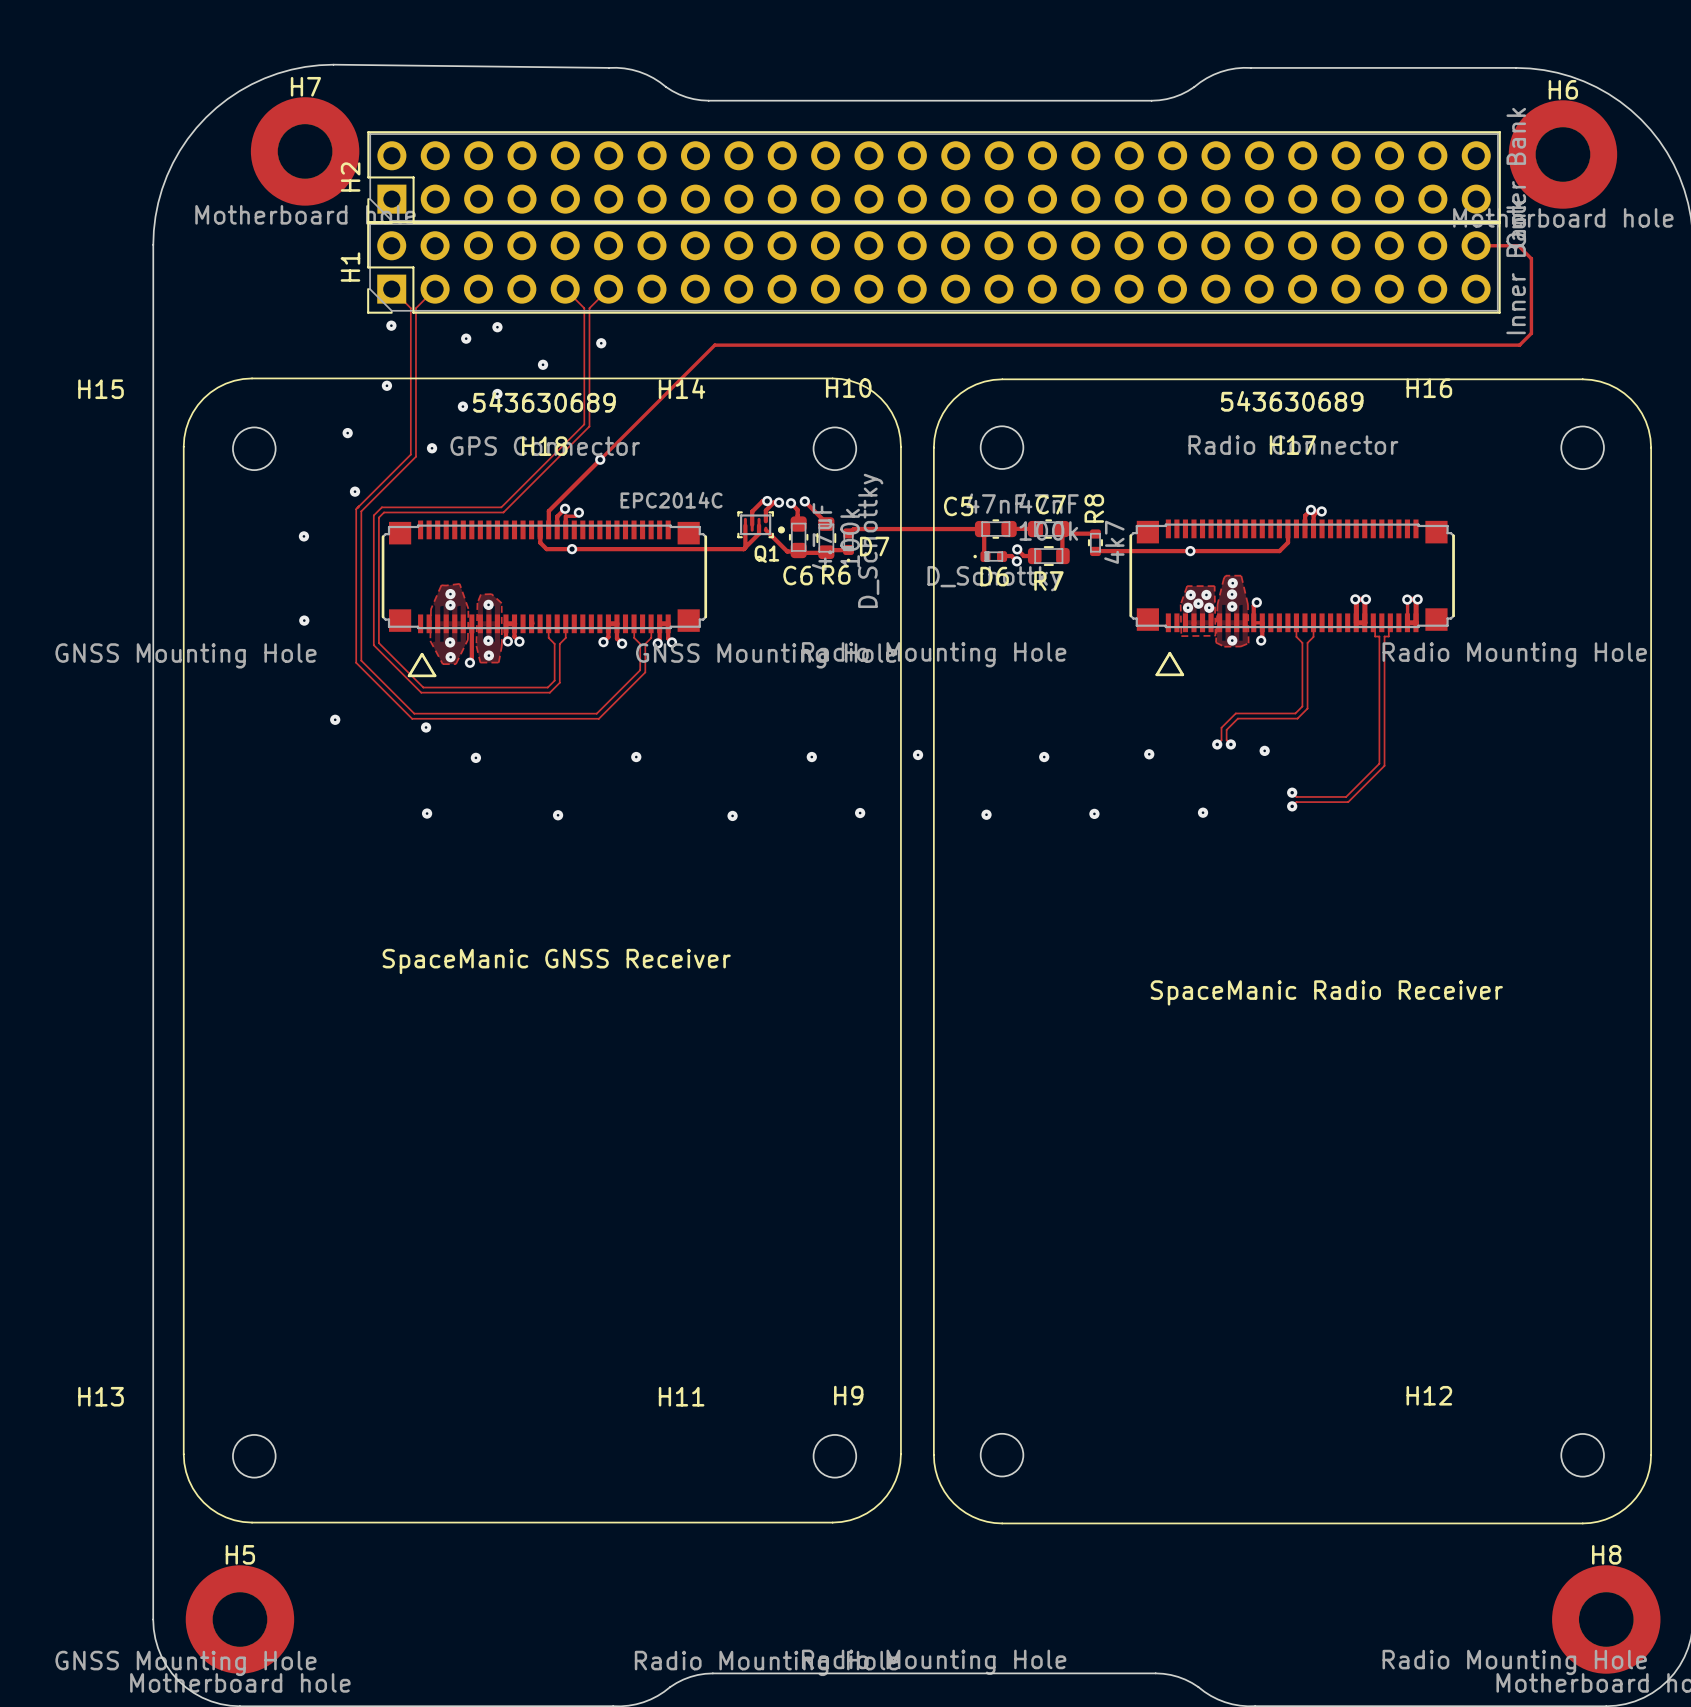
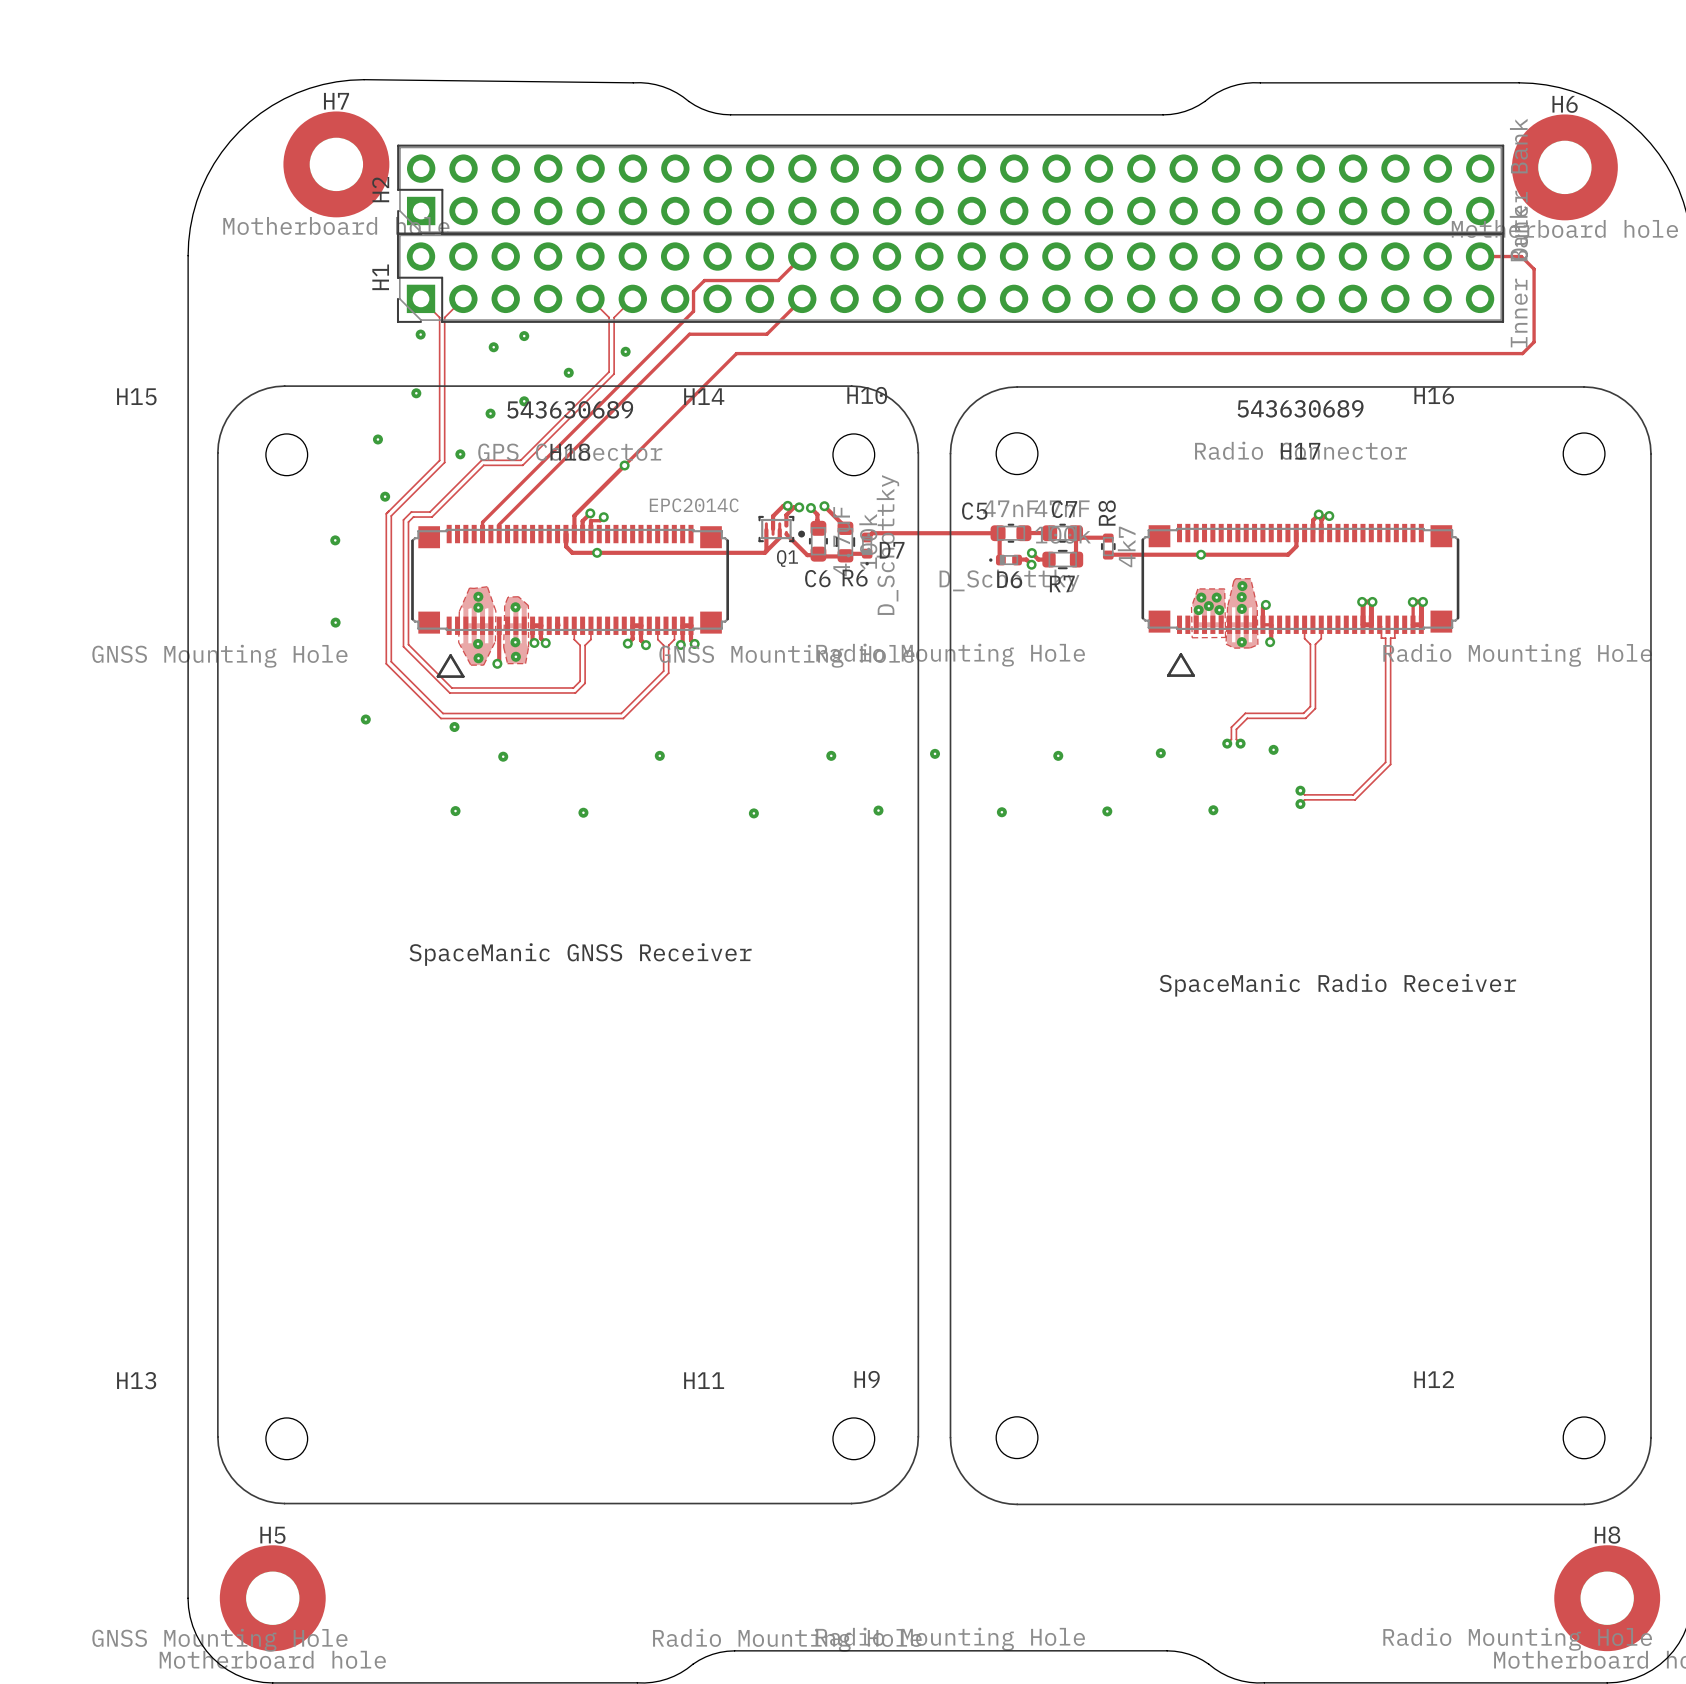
track: none -> (802, 256) (778, 280) (704, 280) (693, 291) (693, 311) (482, 522) (482, 534)
track: none -> (802, 298) (766, 334) (689, 334) (499, 524) (499, 534)
track: (584, 363) (584, 424) (501, 507) (400, 507) -> (609, 371) (520, 460) (481, 460) (429, 512)
track: (589, 366) (589, 426) (503, 512) (403, 512) -> (614, 373) (522, 465) (483, 465) (432, 517)

